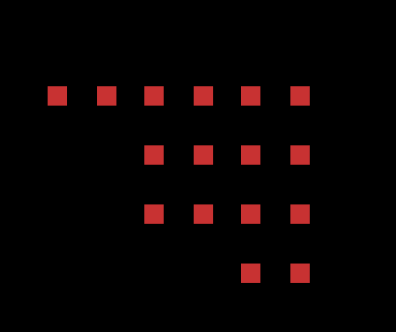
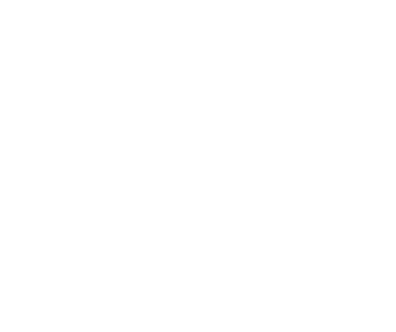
part: (82, 95) -> none
part: (178, 95) -> none
part: (275, 95) -> none
part: (178, 155) -> none
part: (275, 155) -> none
part: (178, 214) -> none
part: (275, 214) -> none
part: (275, 273) -> none

